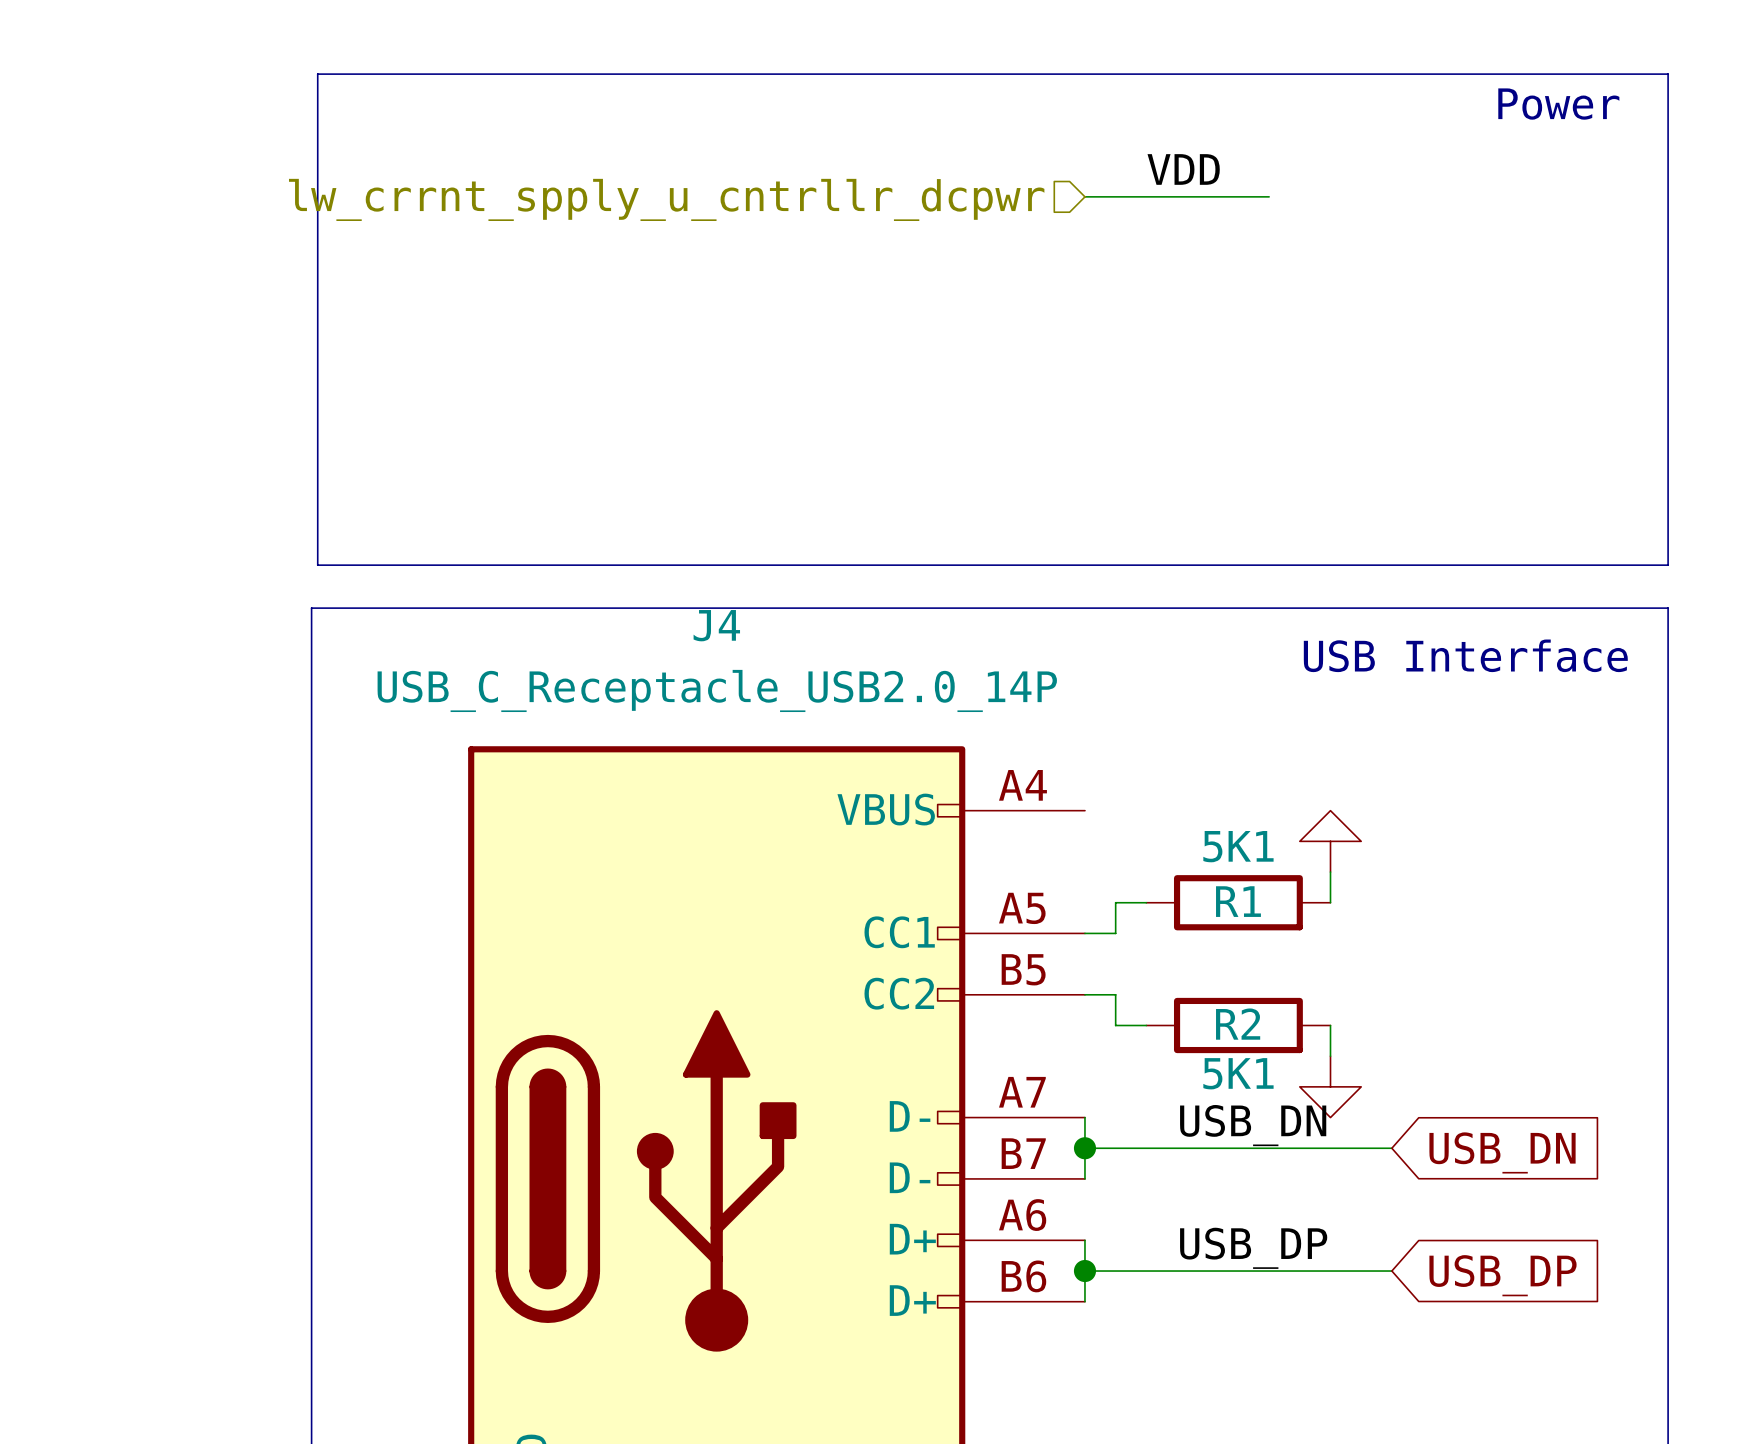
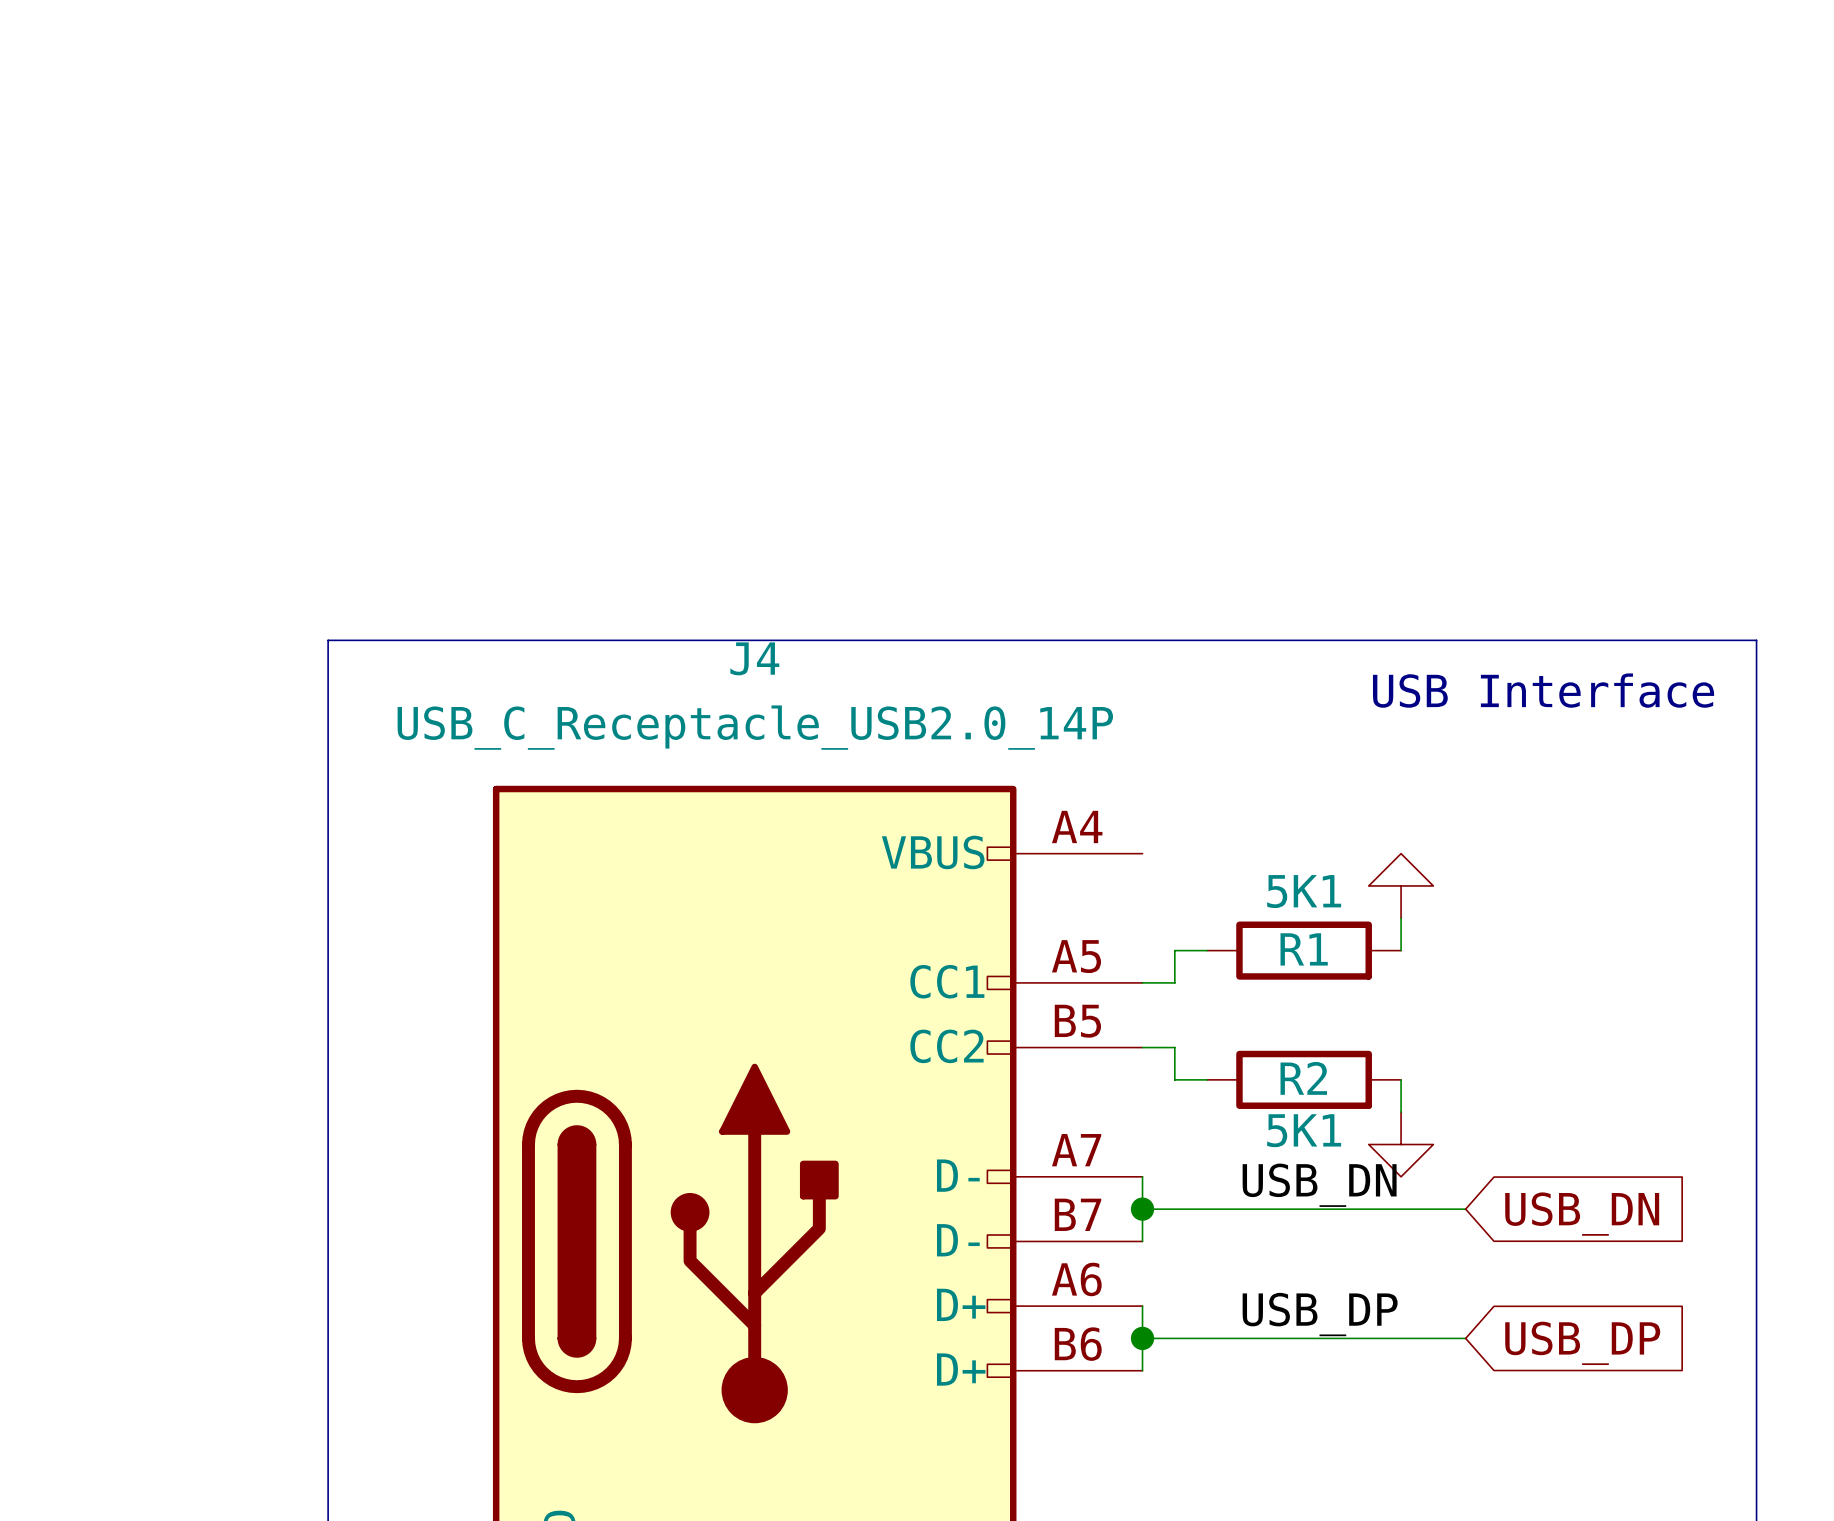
line: (317, 74) (1668, 74) (1668, 565) (317, 565) (317, 74) -> none
text: Power (1558, 104) -> none
label: VDD (1183, 169) -> none
wire: (1084, 196) (1269, 196) -> none
hierarchical label: lw_crrnt_spply_u_cntrllr_dcpwr (666, 199) -> none

